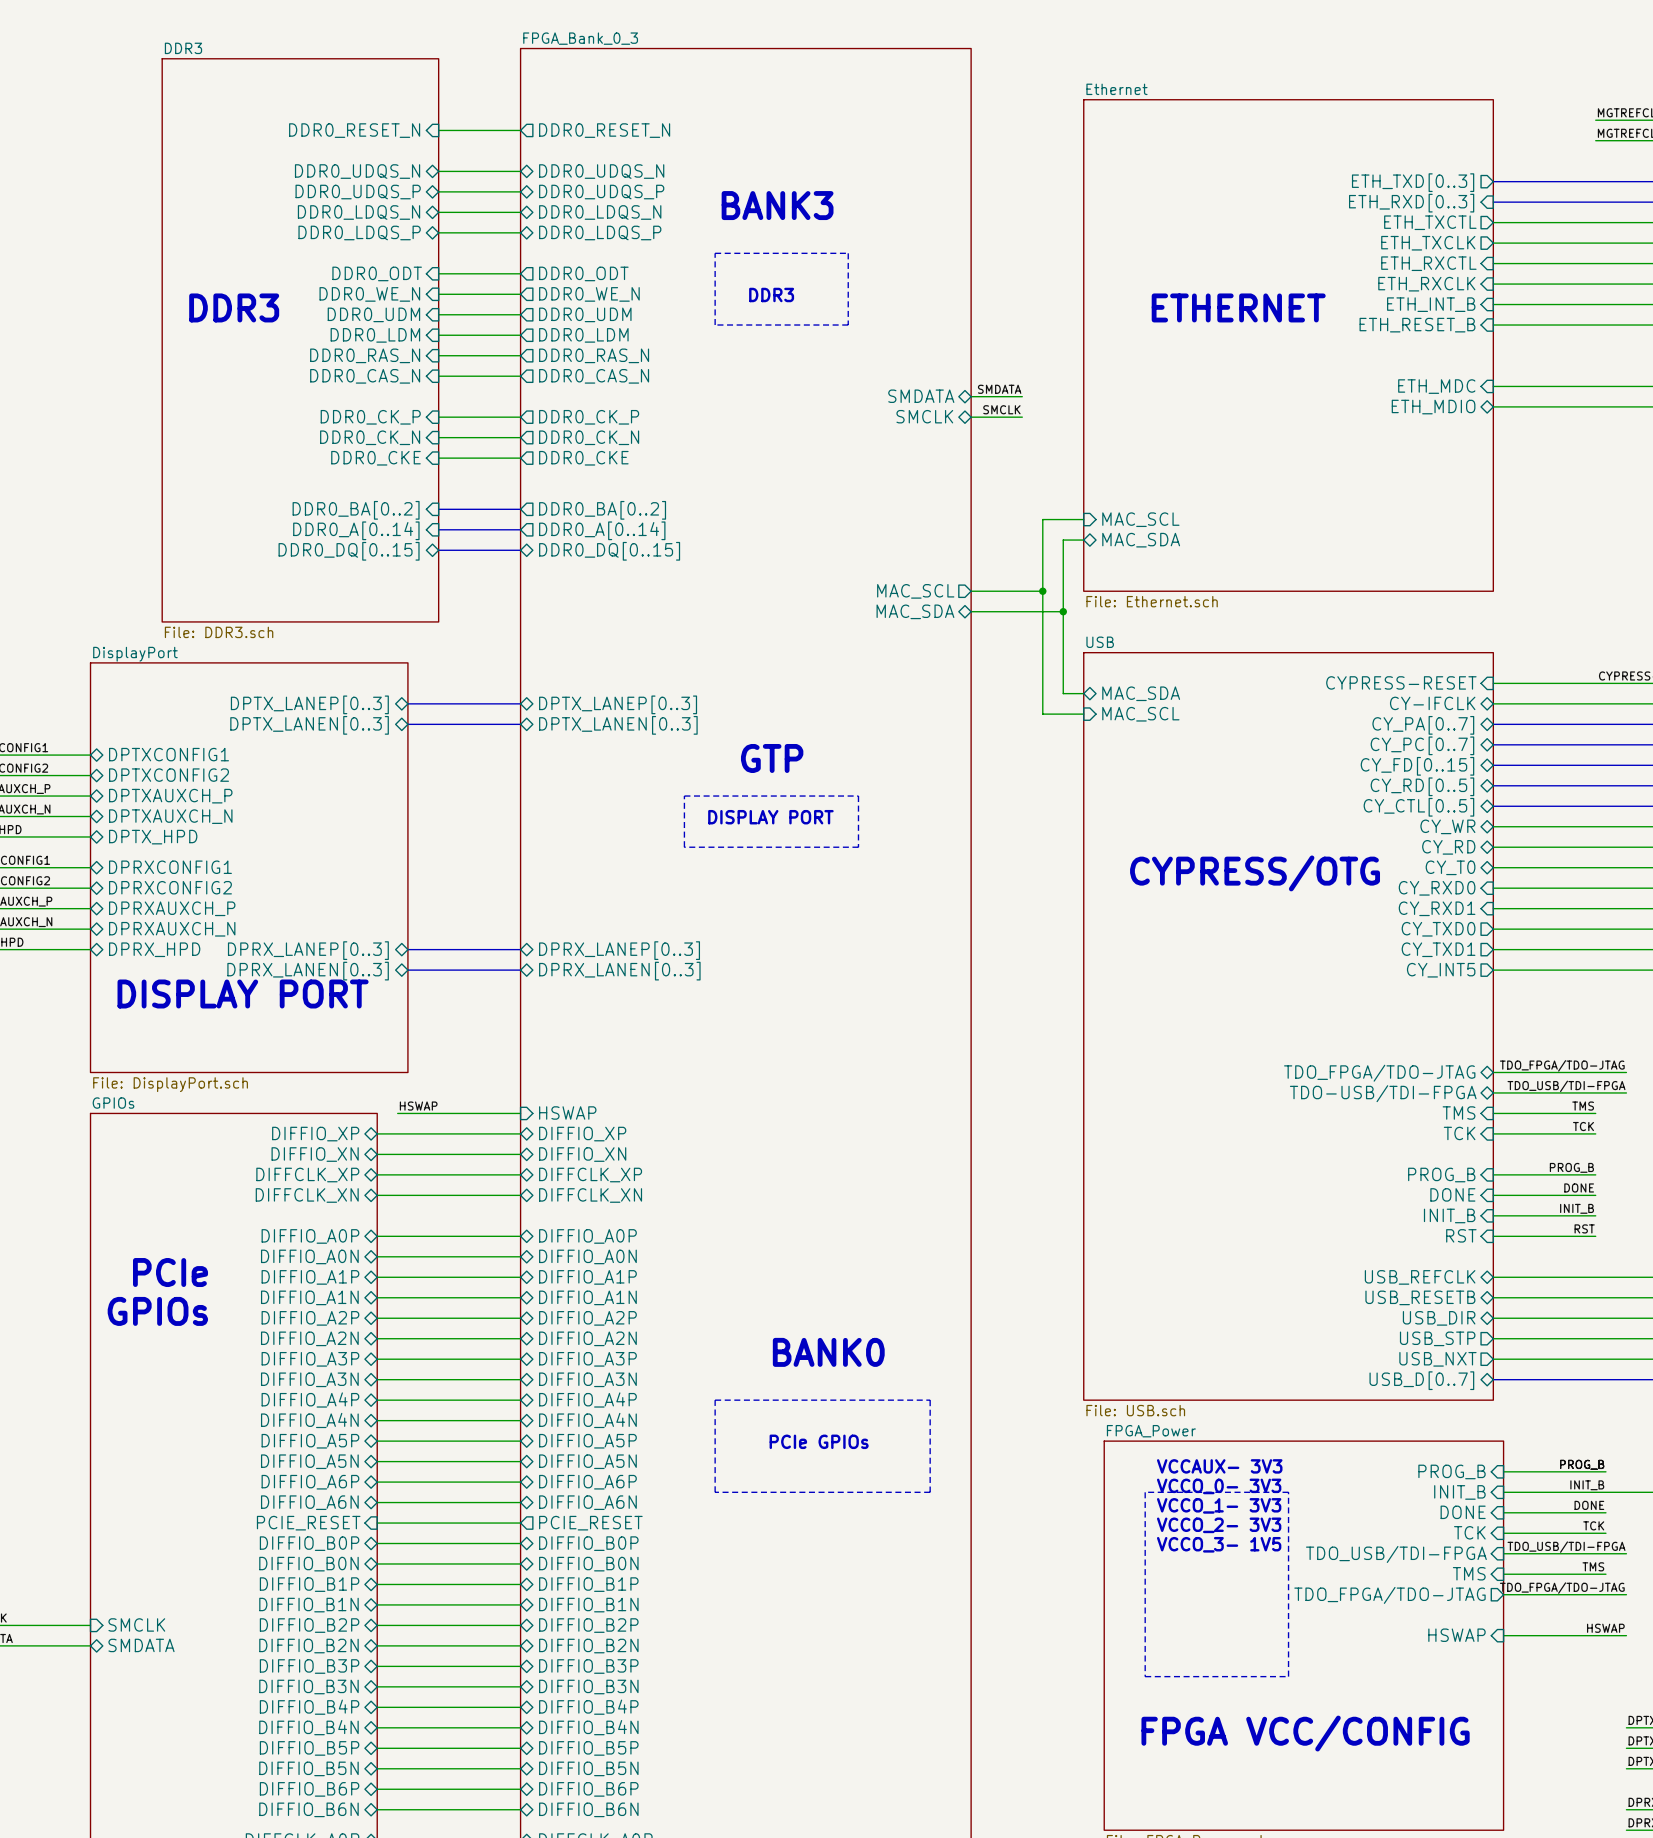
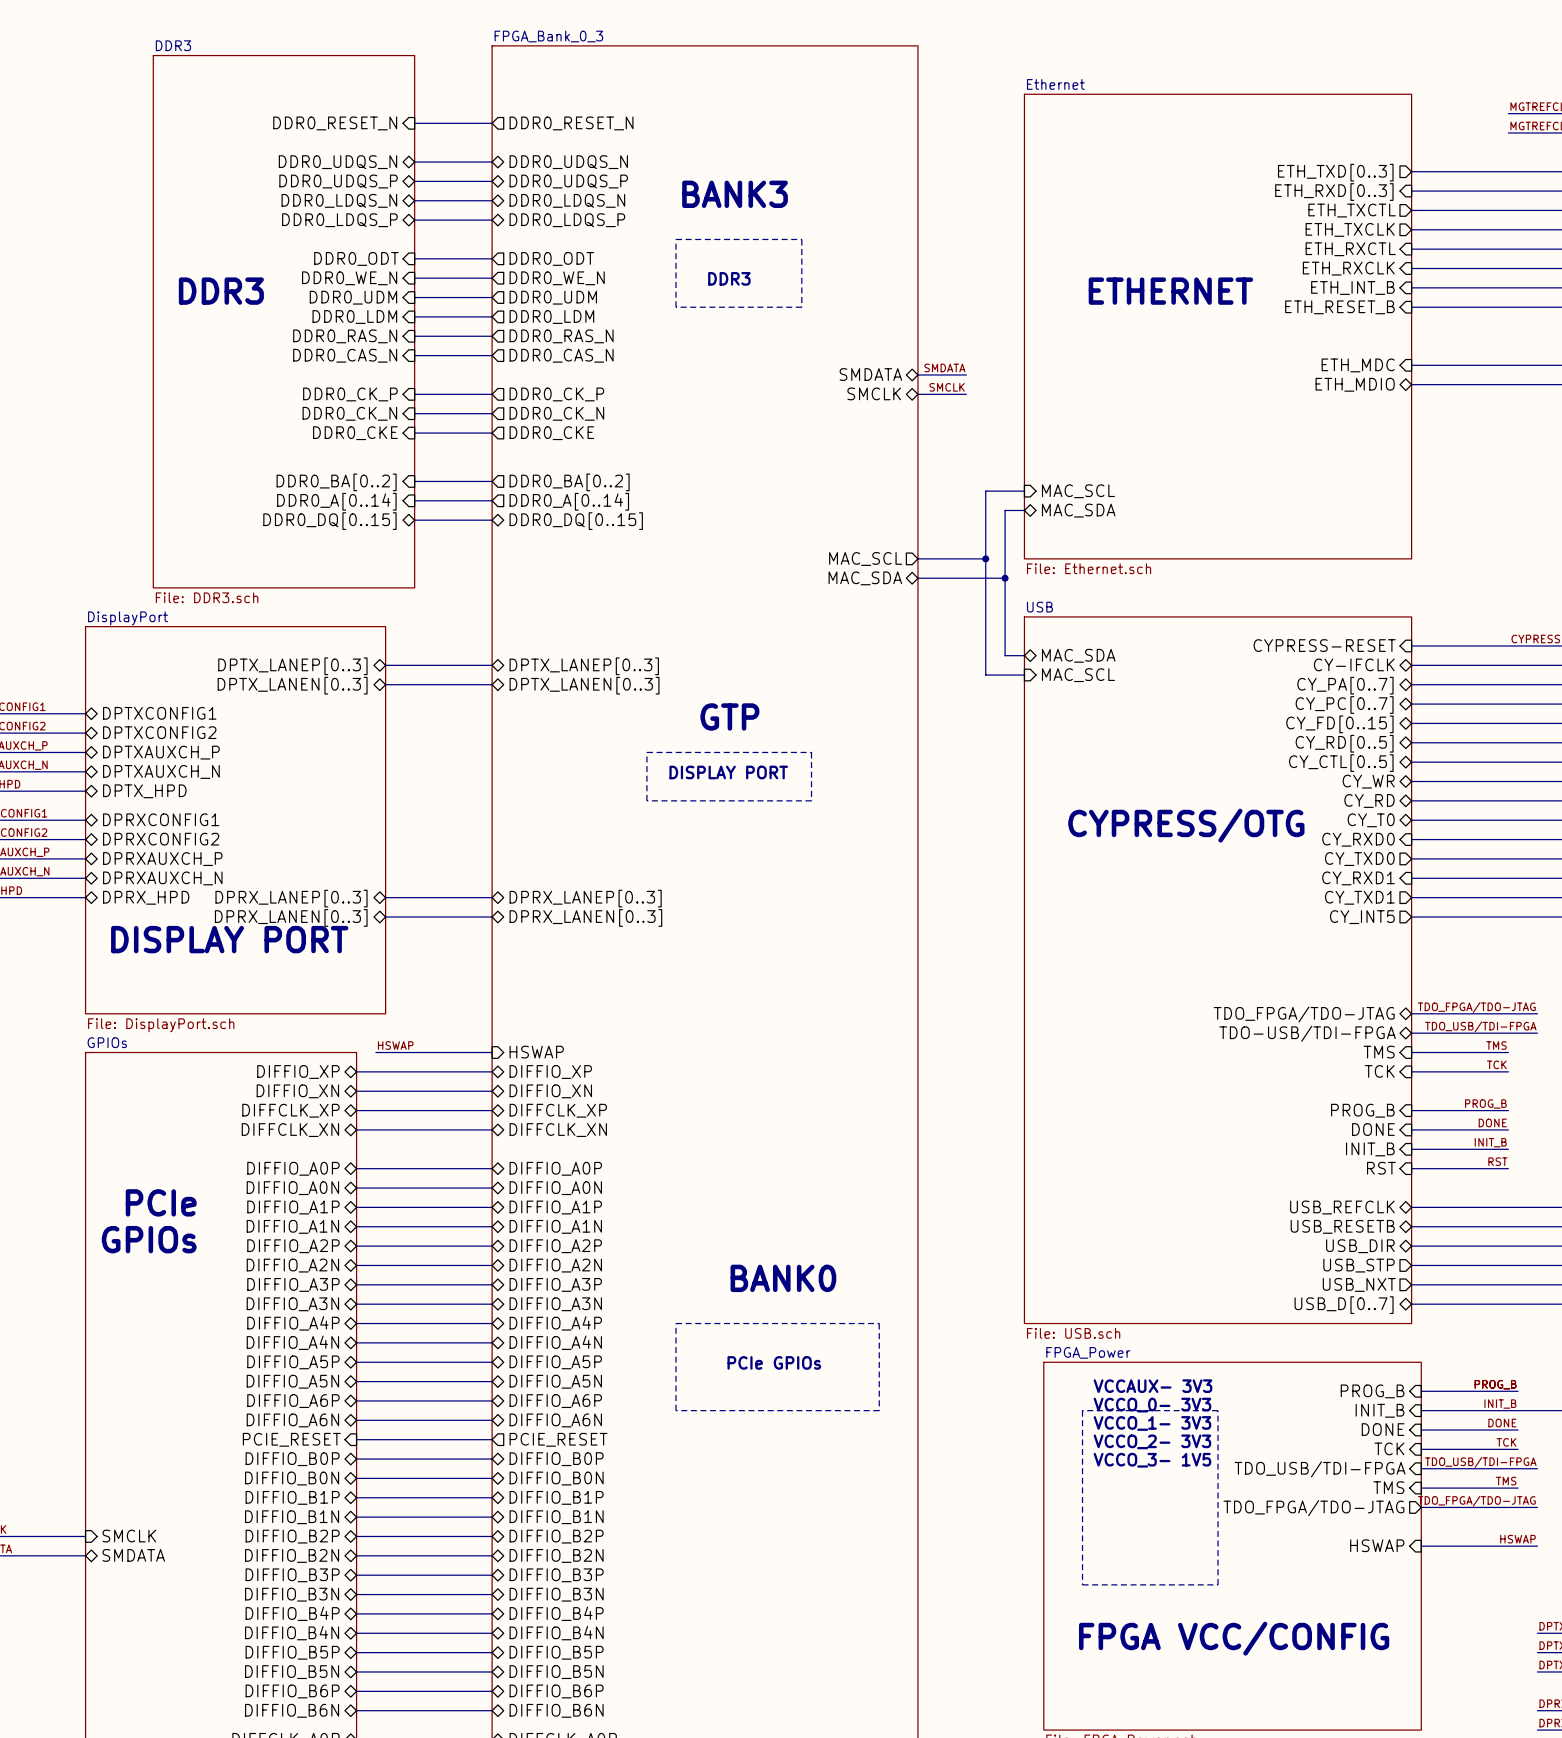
sheet pin shape: input (1437, 908) -> output (1359, 859)
sheet pin: CY_RXD1 (1437, 908) -> CY_TXD0 (1359, 859)
sheet pin shape: output (1438, 929) -> input (1358, 878)
sheet pin: CY_TXD0 (1438, 929) -> CY_RXD1 (1358, 878)

